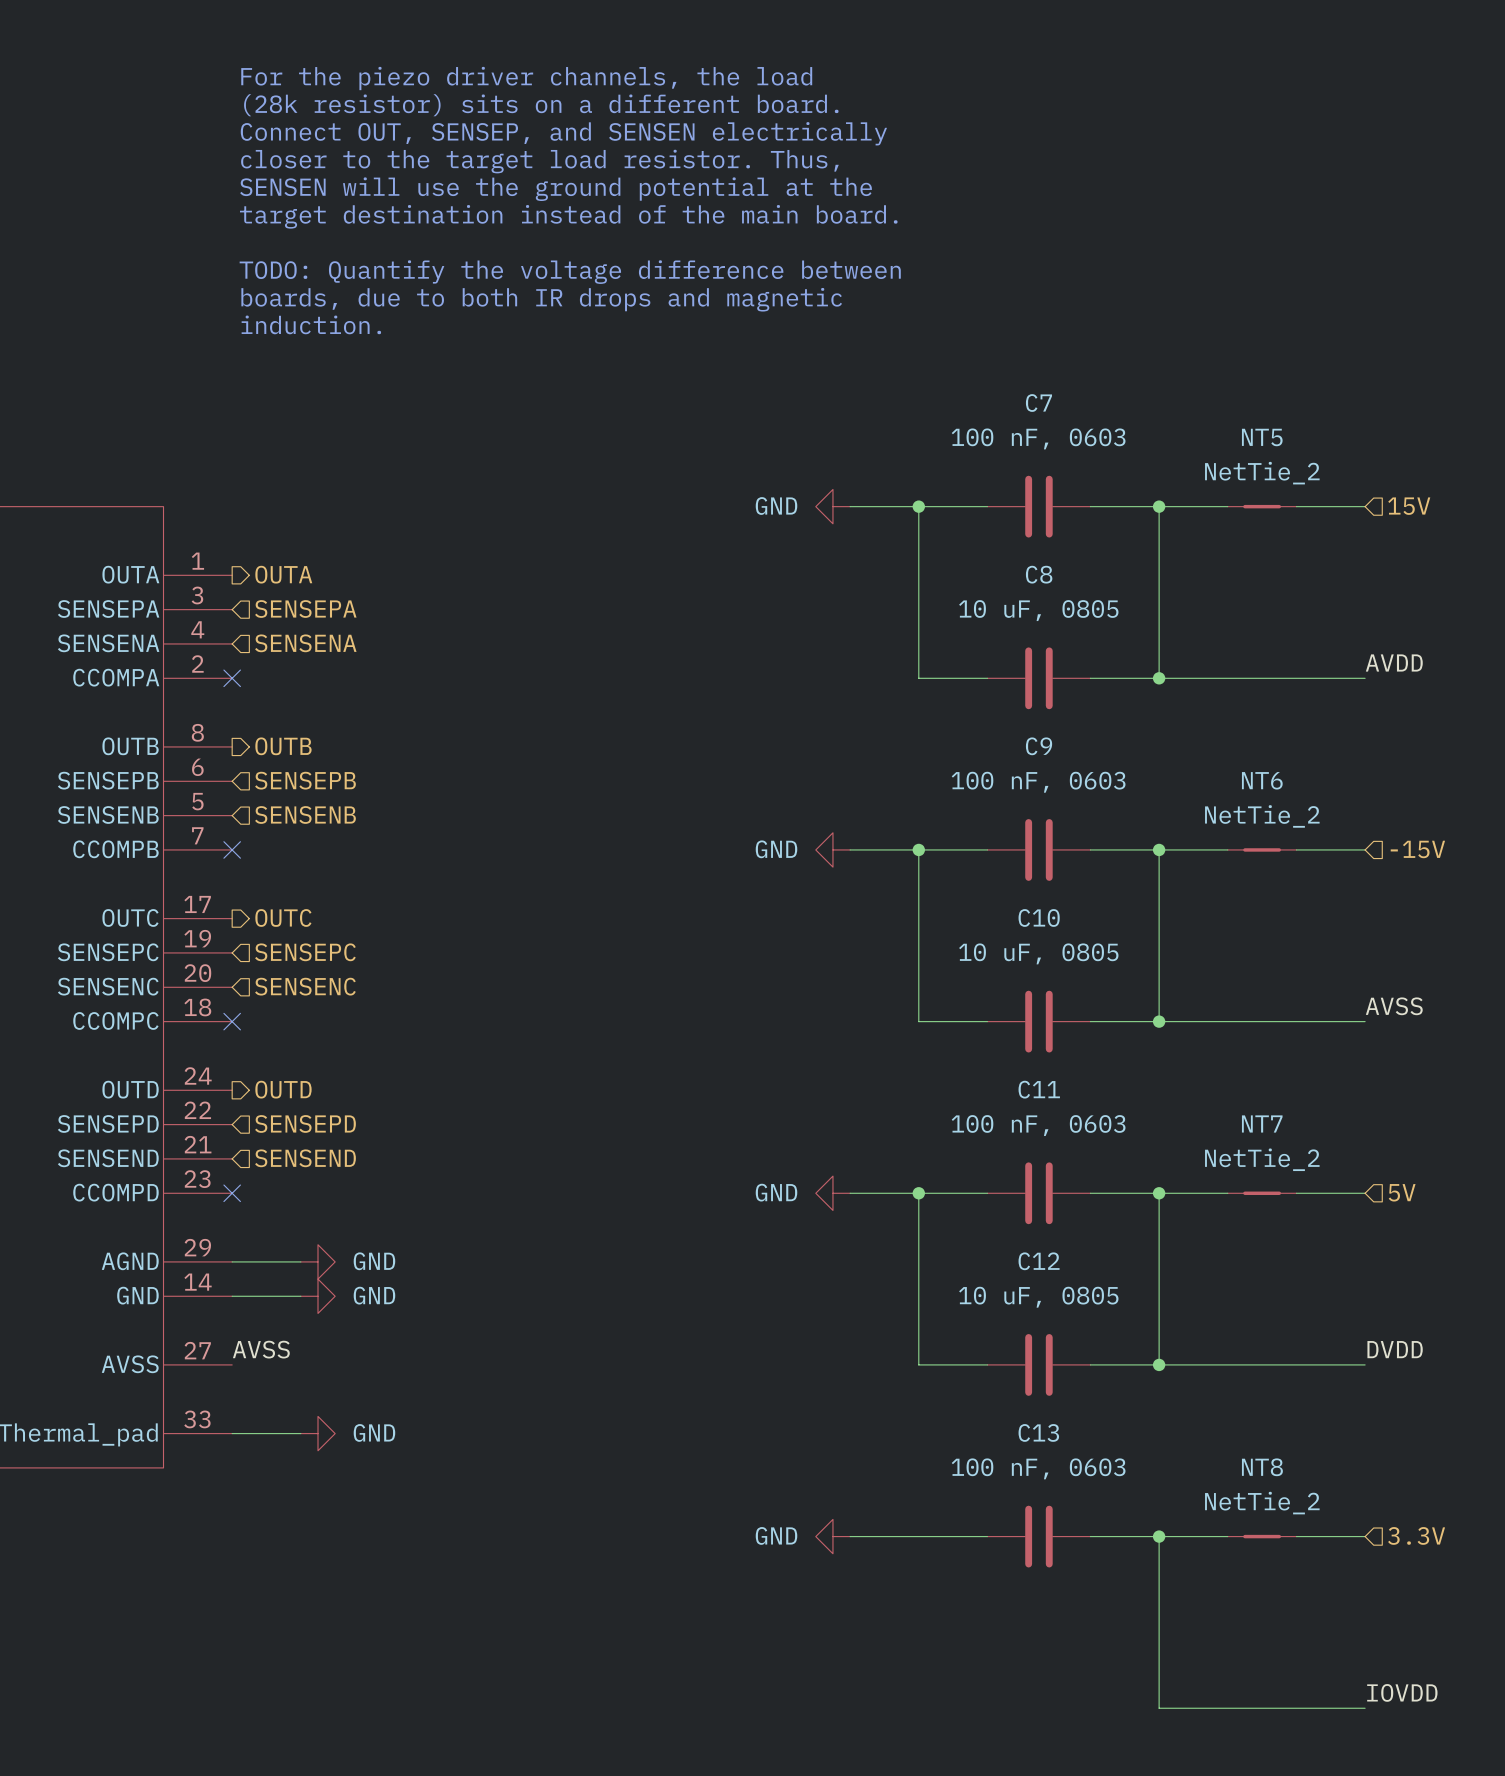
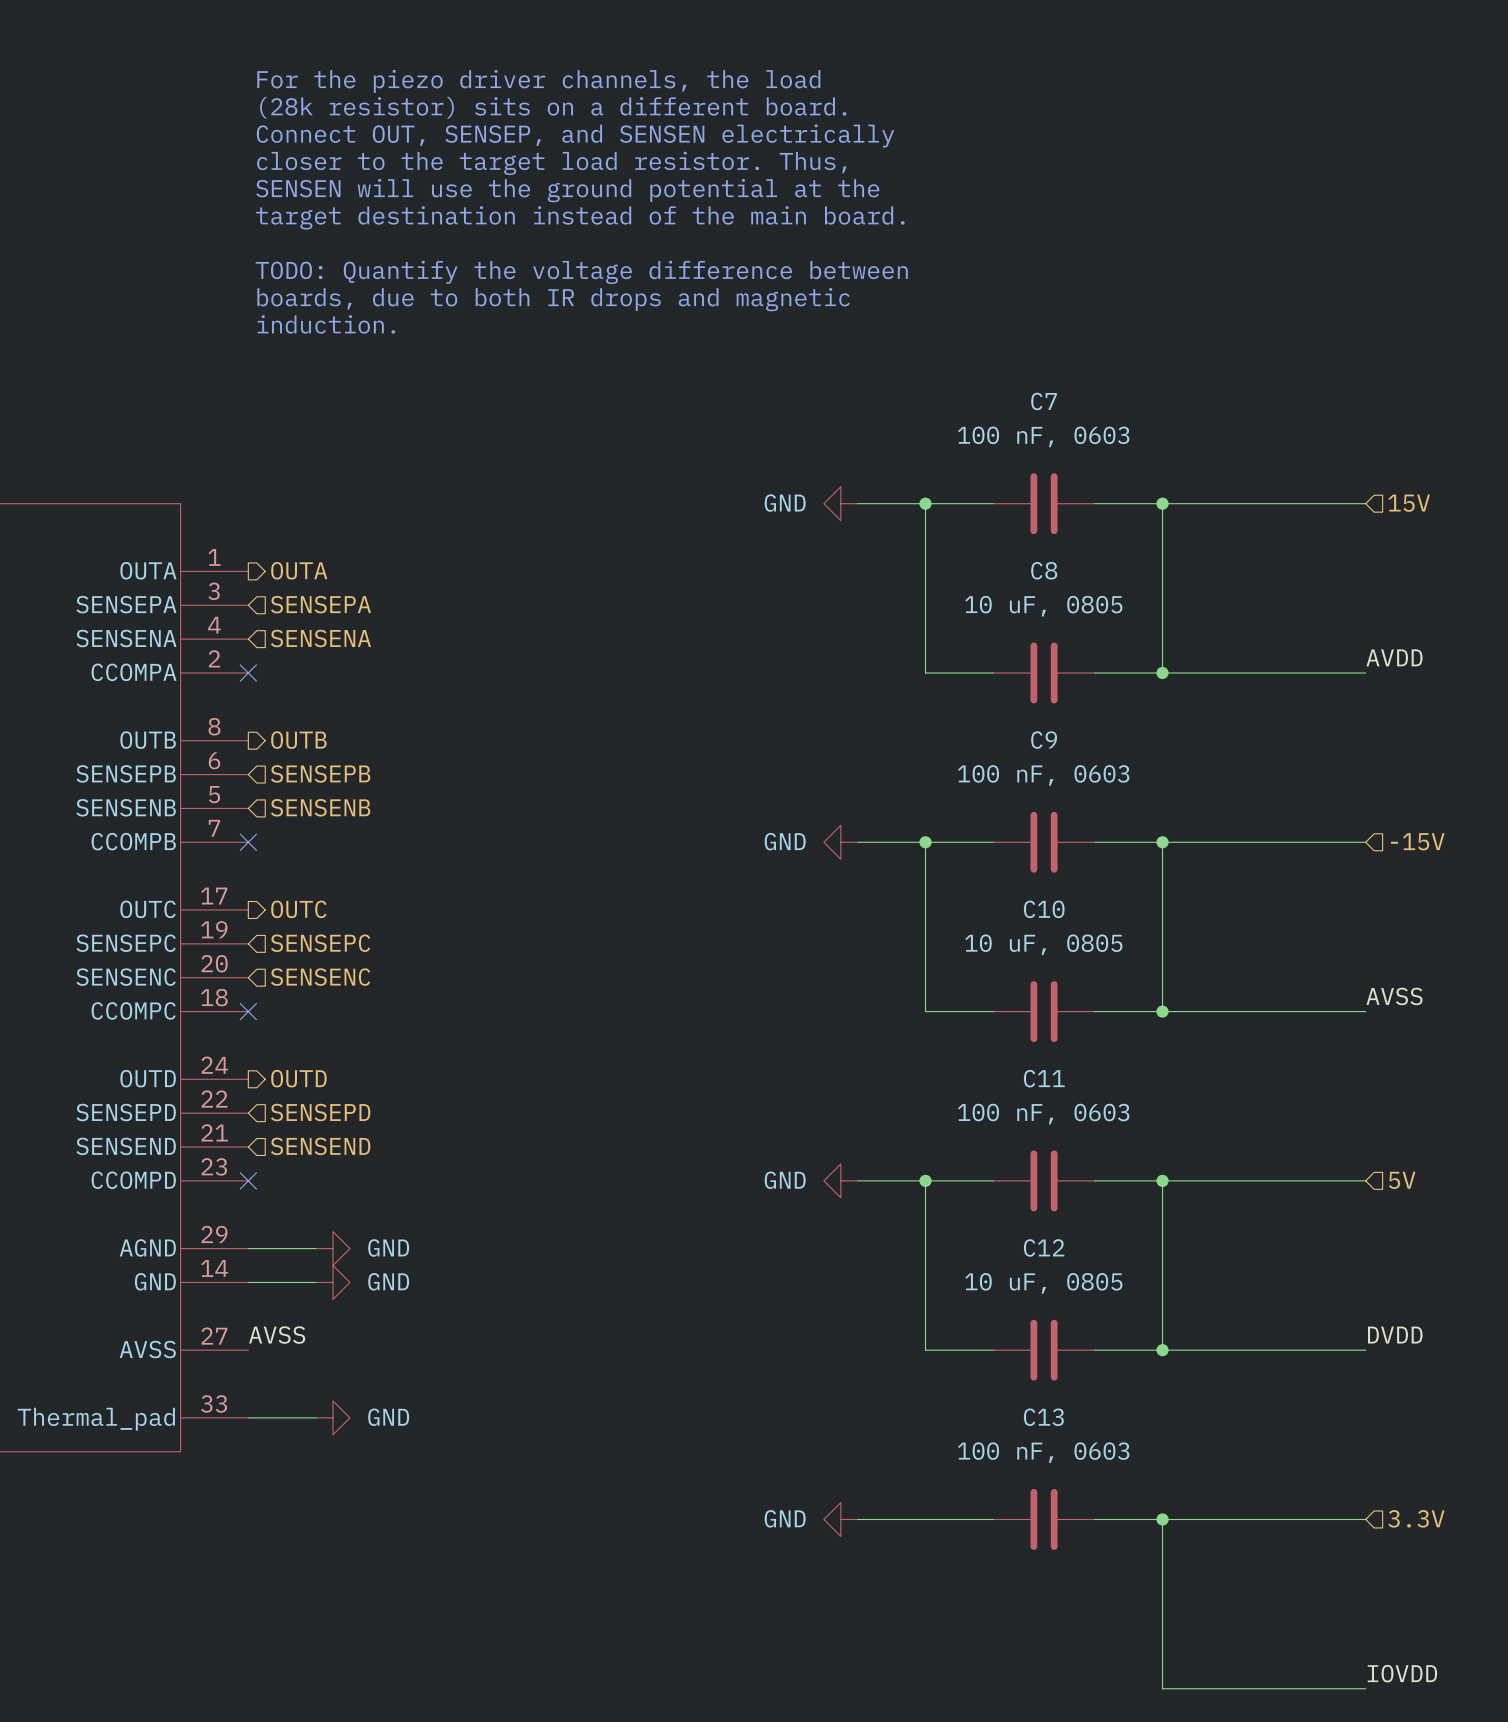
NT5: NetTie_2 (1262, 506) -> none
NT6: NetTie_2 (1262, 849) -> none
NT7: NetTie_2 (1262, 1193) -> none
NT8: NetTie_2 (1262, 1536) -> none

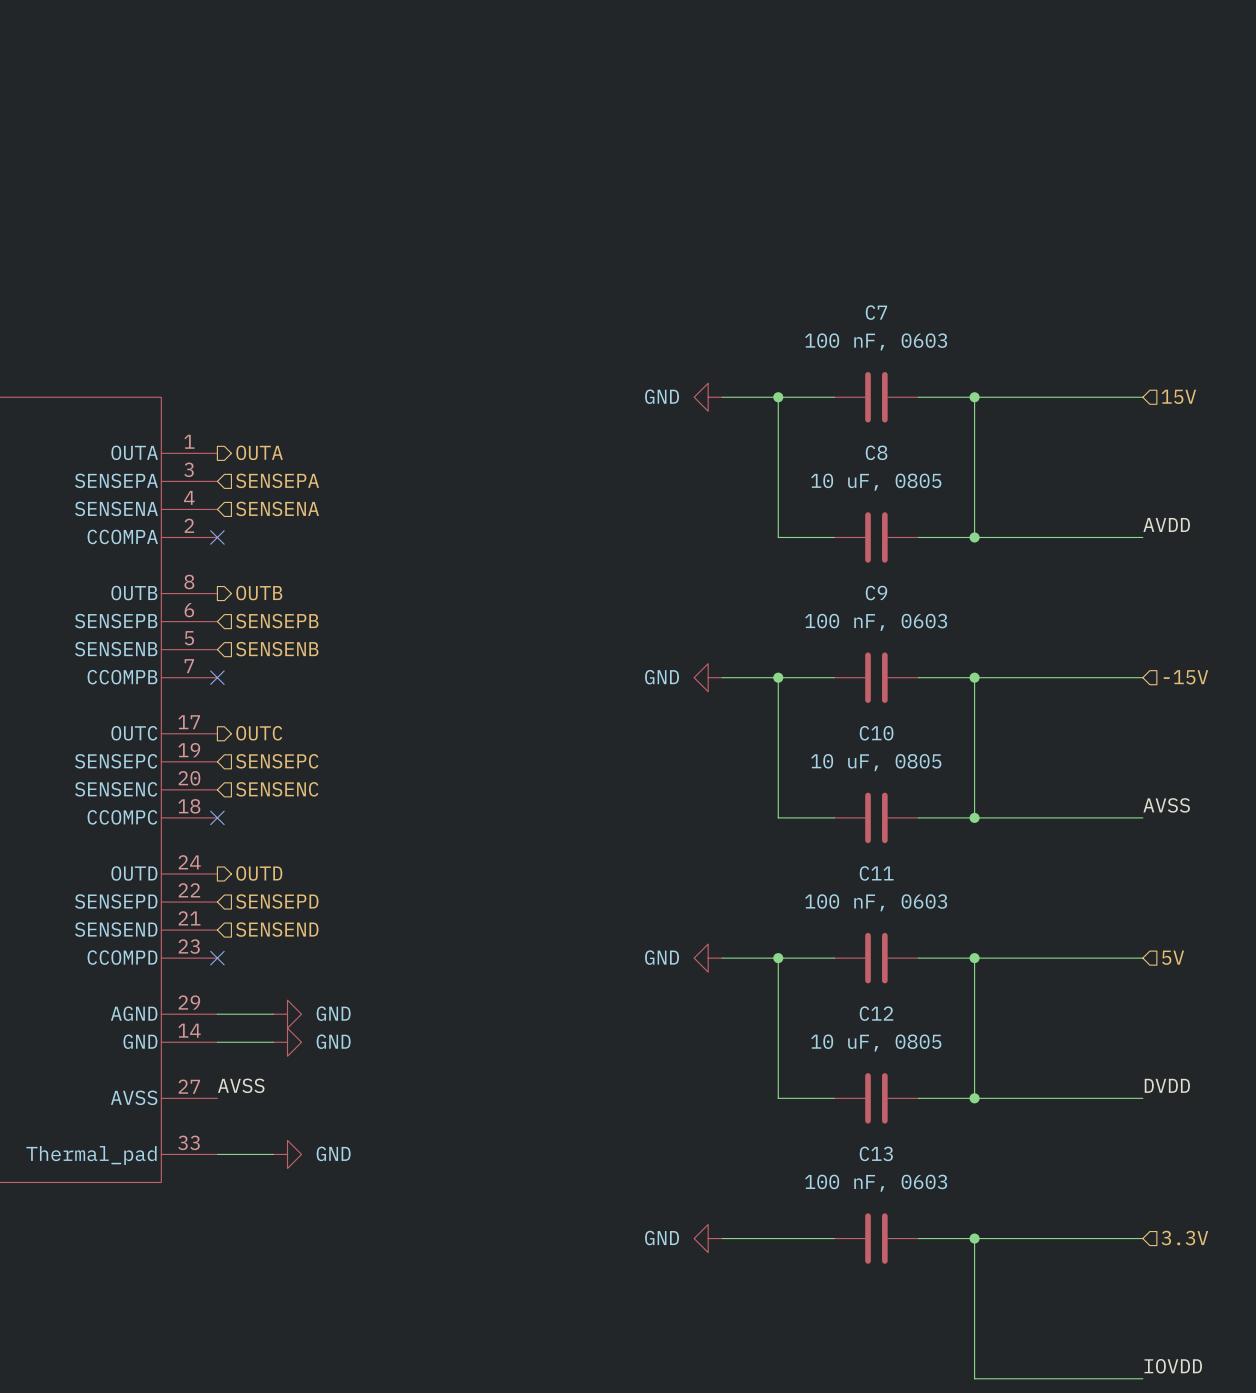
text: For the piezo driver channels, the load (538, 81) -> none
text: (28k resistor) sits on a different board. (553, 107) -> none
text: Connect OUT, SENSEP, and SENSEN electrically (575, 135) -> none
text: closer to the target load resistor. Thus, (551, 163) -> none
text: SENSEN will use the ground potential at the (567, 190) -> none
text: target destination instead of the main board. (580, 217) -> none
text: TODO: Quantify the voltage difference between (581, 272) -> none
text: boards, due to both IR drops and magnetic (553, 299) -> none
text: induction. (326, 324) -> none

